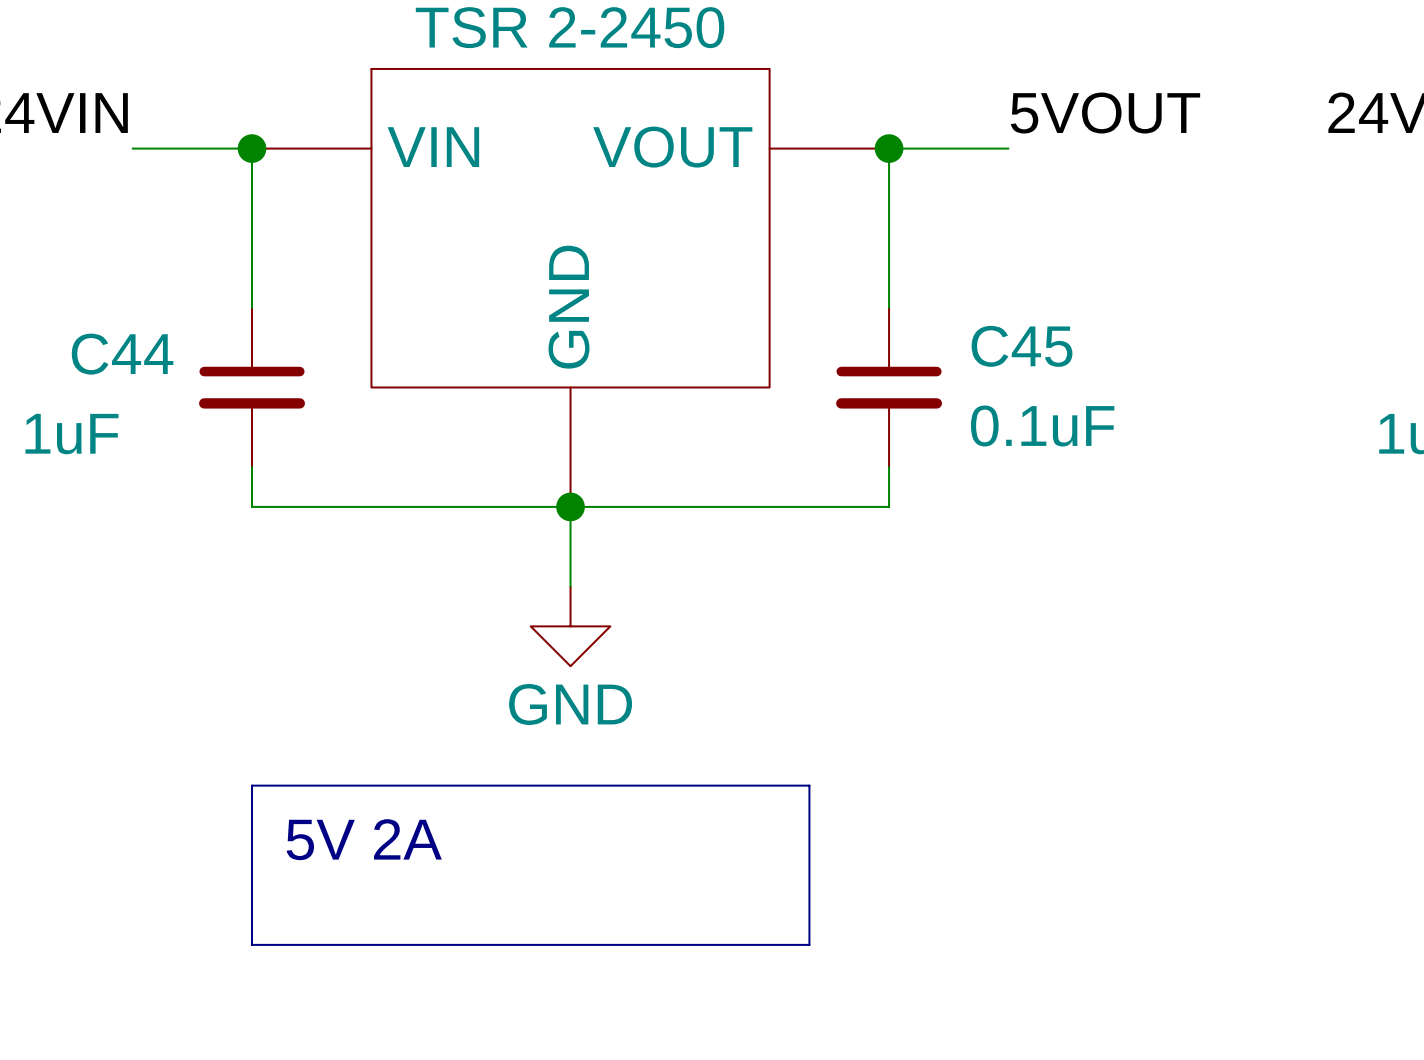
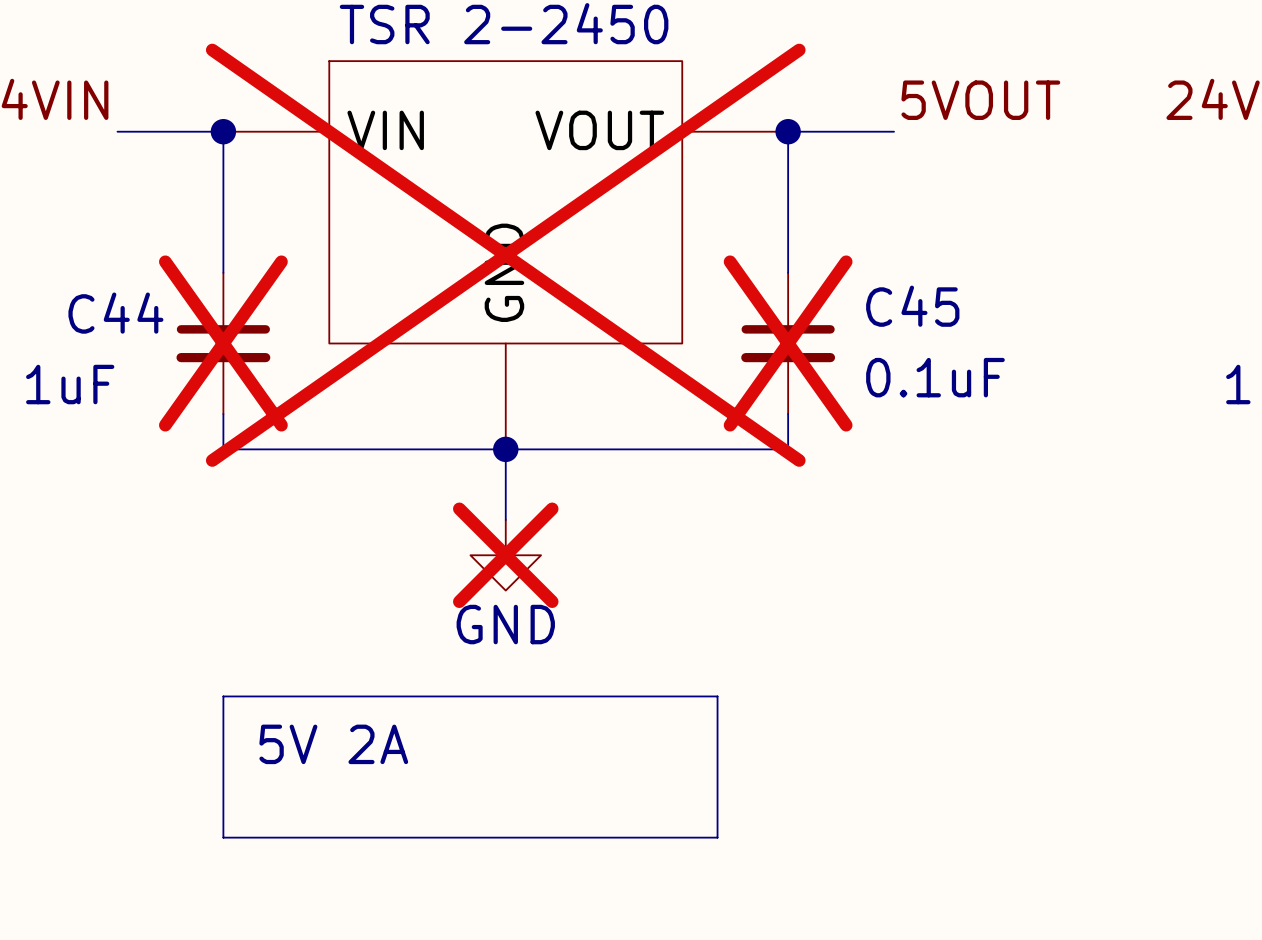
part do-not-place cross: none -> (505, 255)
C44 do-not-place cross: none -> (223, 343)
C45 do-not-place cross: none -> (788, 343)
power symbol do-not-place cross: none -> (505, 555)

